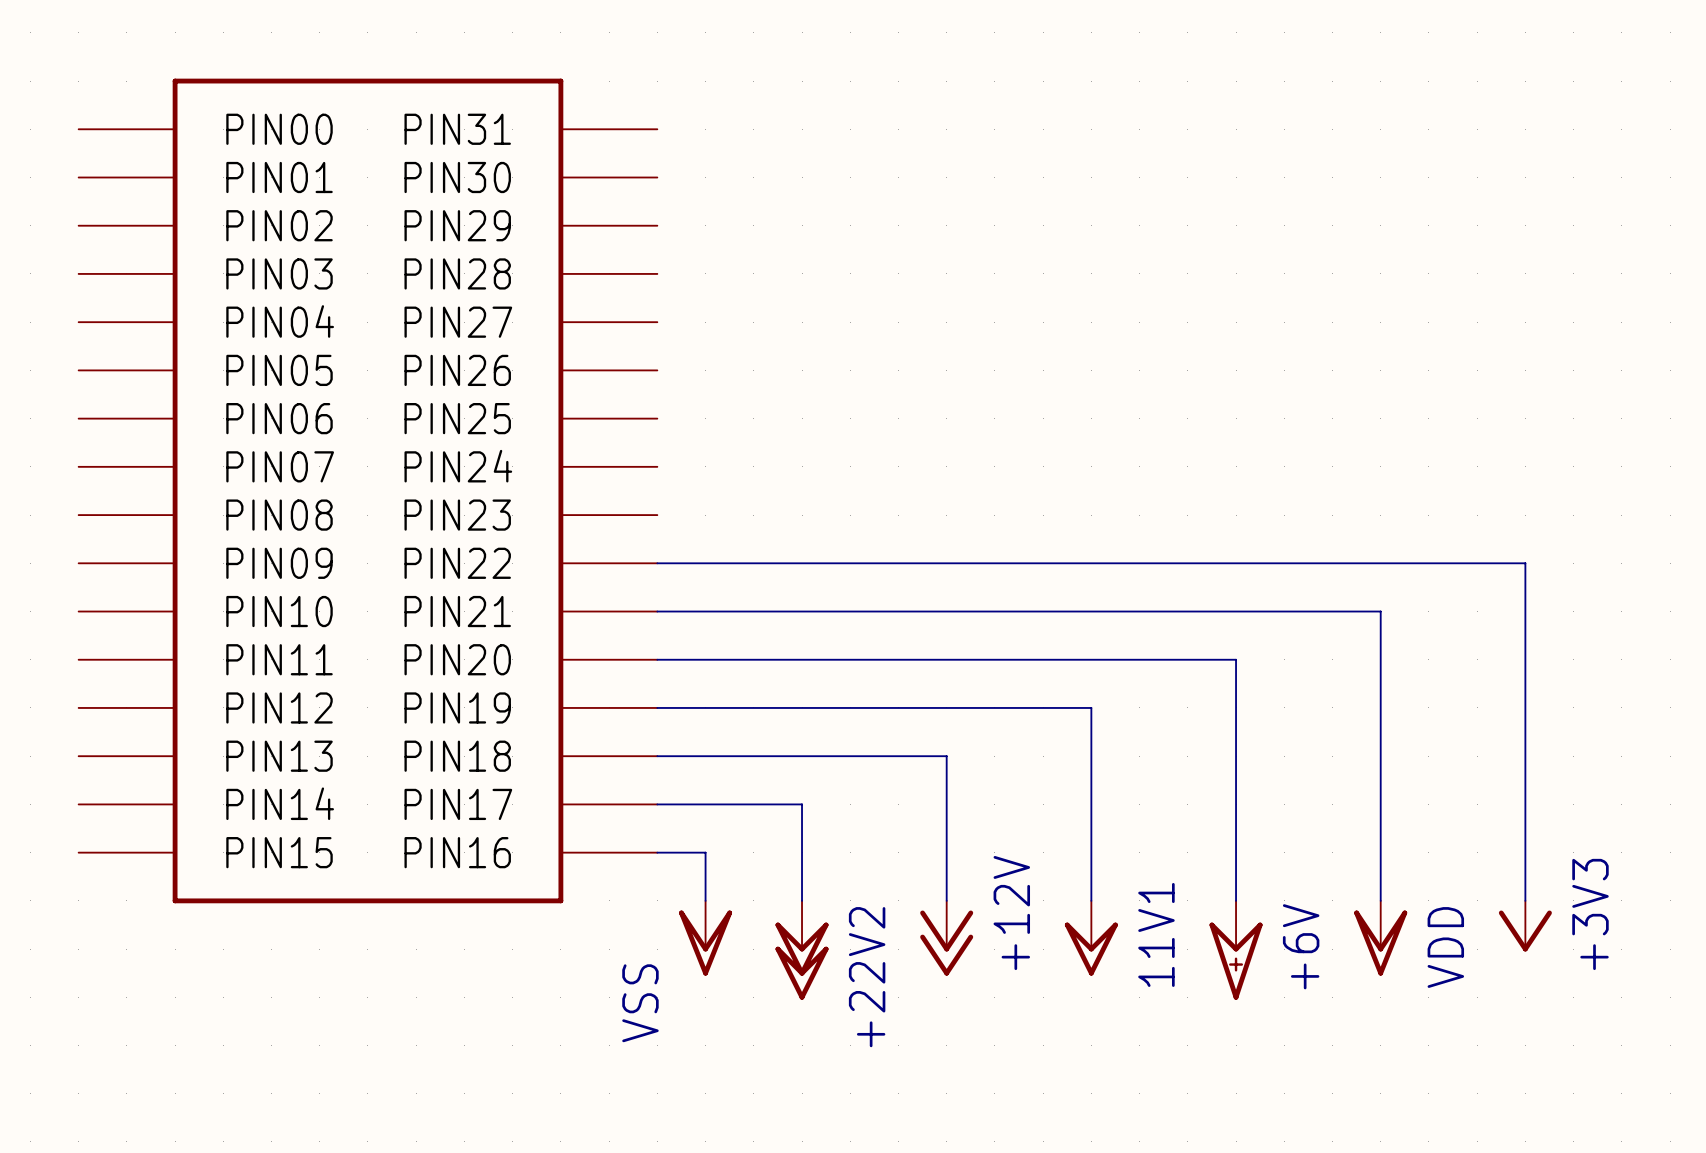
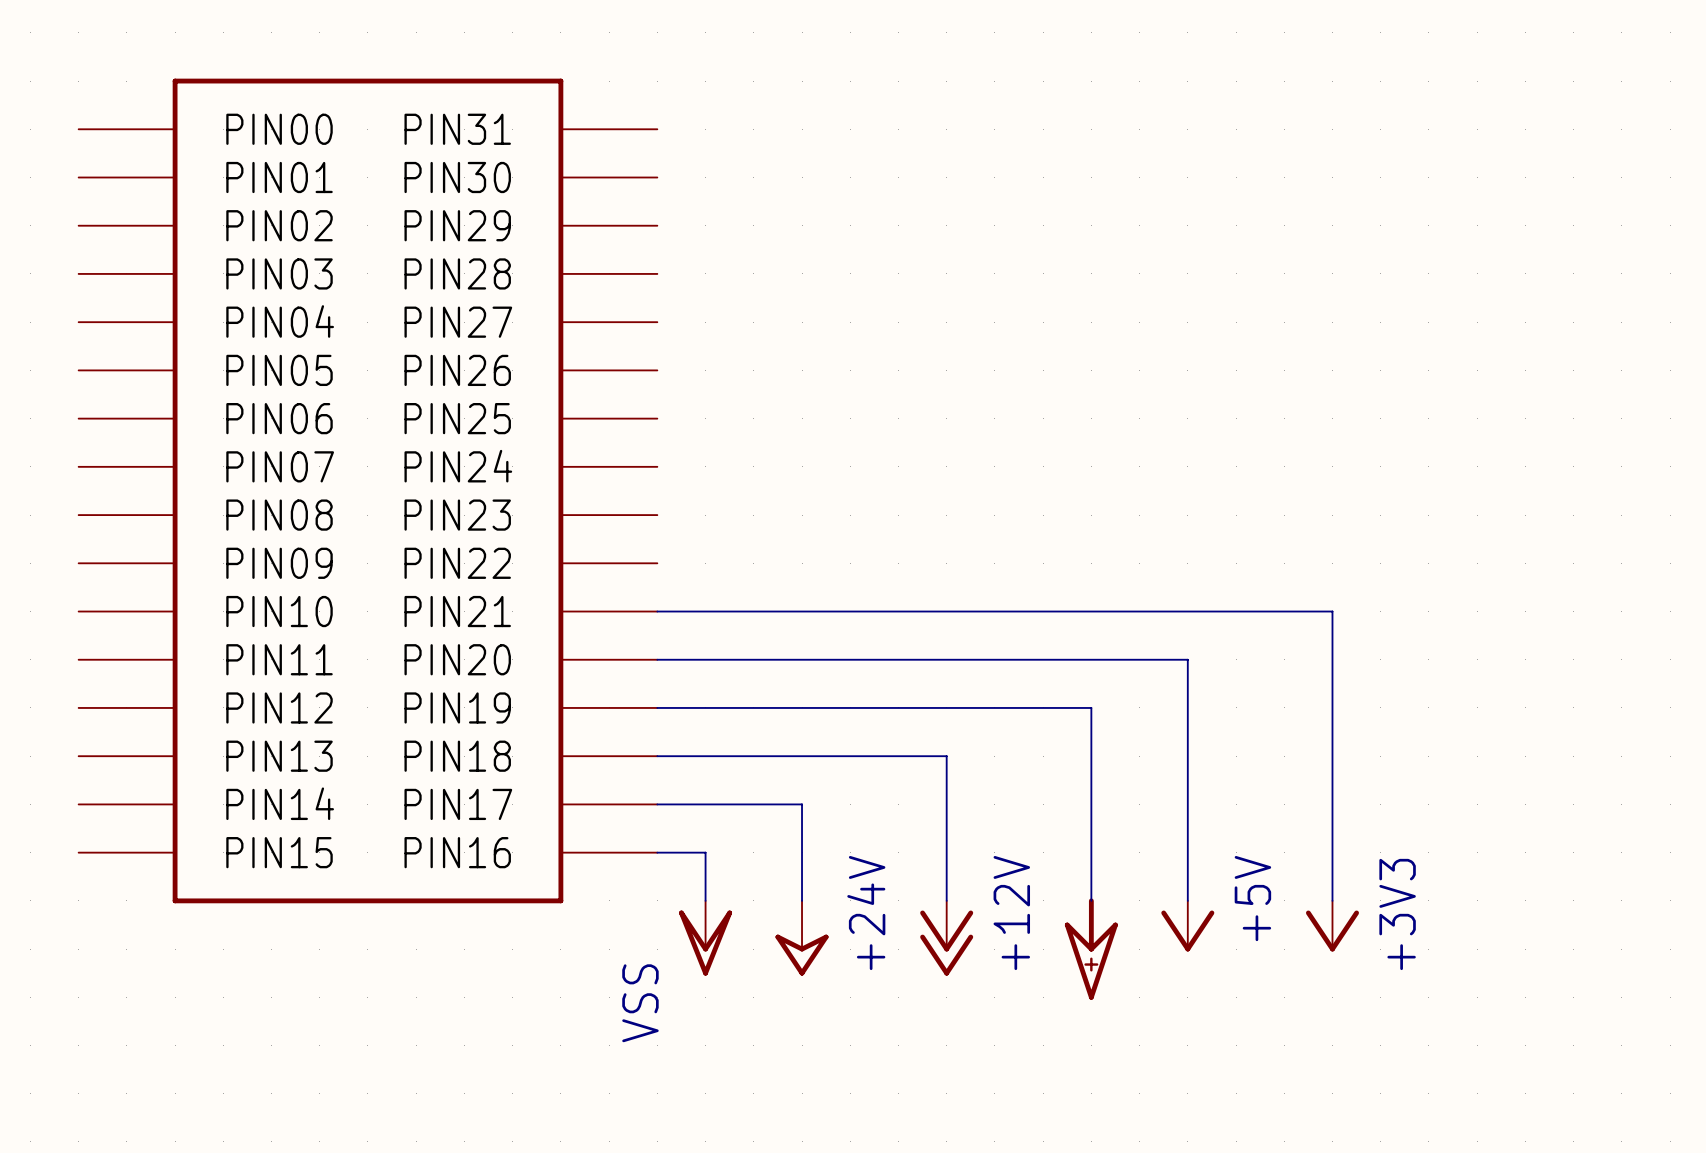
wire: (657, 563) (1525, 563) (1525, 900) -> none
wire: (1332, 611) (1380, 611) (1380, 900) -> (1332, 611) (1332, 900)
wire: (1187, 659) (1236, 659) (1236, 900) -> (1187, 659) (1187, 900)
power symbol shape: [1064, 900, 1118, 976] -> [1064, 898, 1118, 1000]
power symbol: none -> +5V (1187, 926)
power symbol position: +3V3 (1525, 926) -> +3V3 (1332, 926)
power symbol text: 11V1 (1156, 934) -> none
power symbol: VDD (1380, 938) -> none
power symbol: +22V2 (802, 950) -> +24V (802, 938)
power symbol: +6V (1236, 950) -> none

